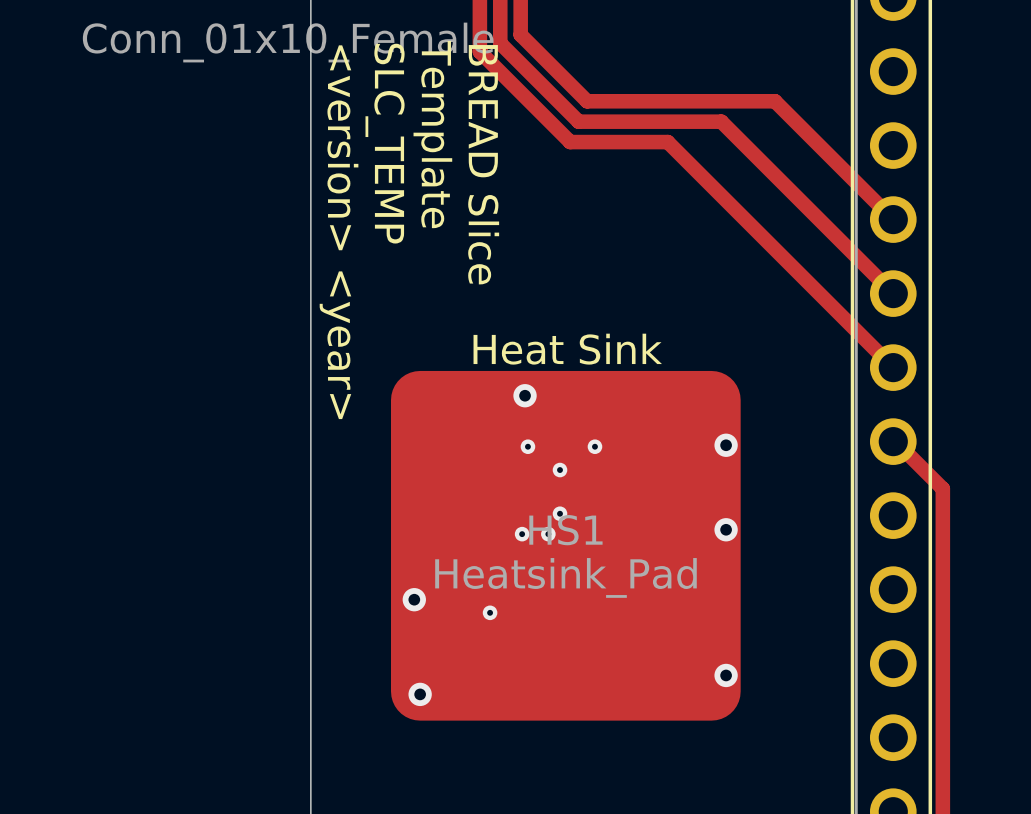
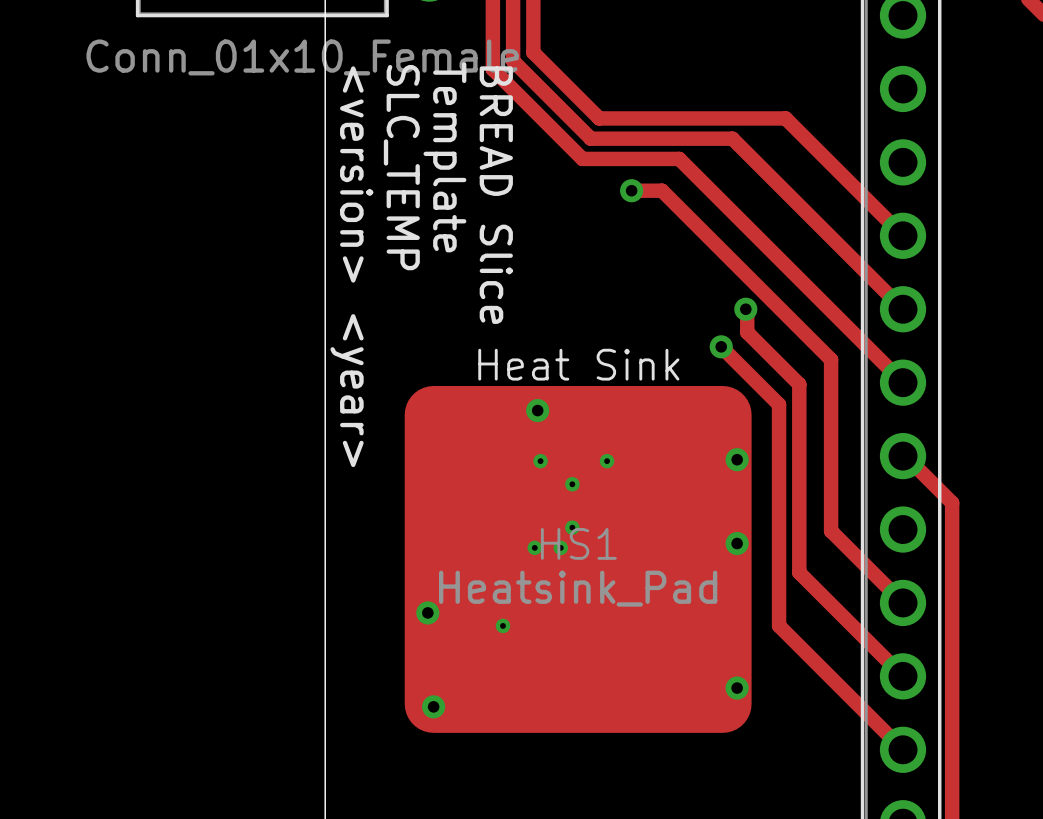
track: none -> (631, 190) (662, 190) (831, 359) (831, 531) (903, 602)
via: none -> (631, 190)
track: none -> (745, 309) (747, 332) (799, 384) (799, 572) (903, 676)
via: none -> (745, 309)
track: none -> (721, 346) (779, 404) (779, 625) (903, 749)
via: none -> (721, 346)

